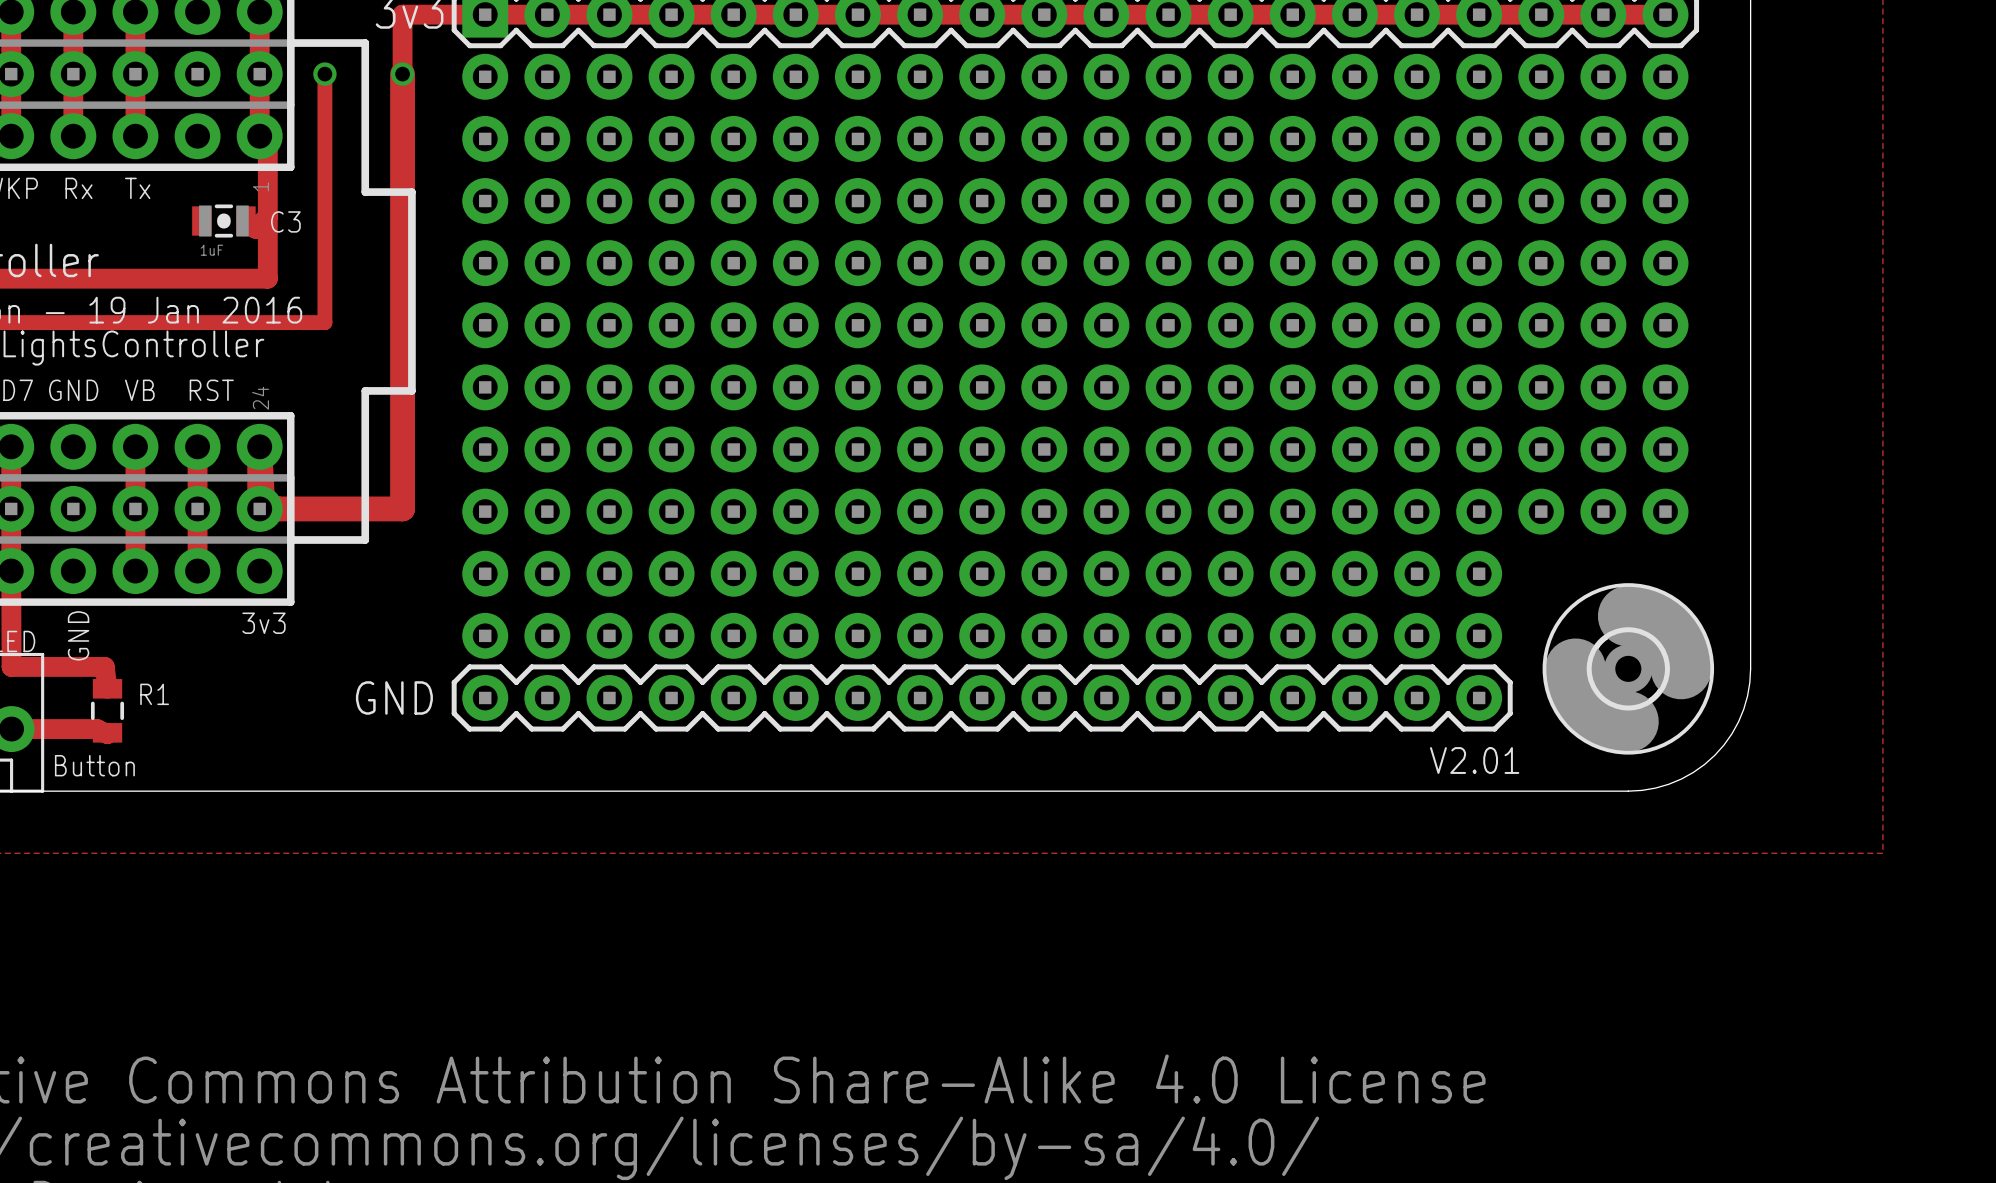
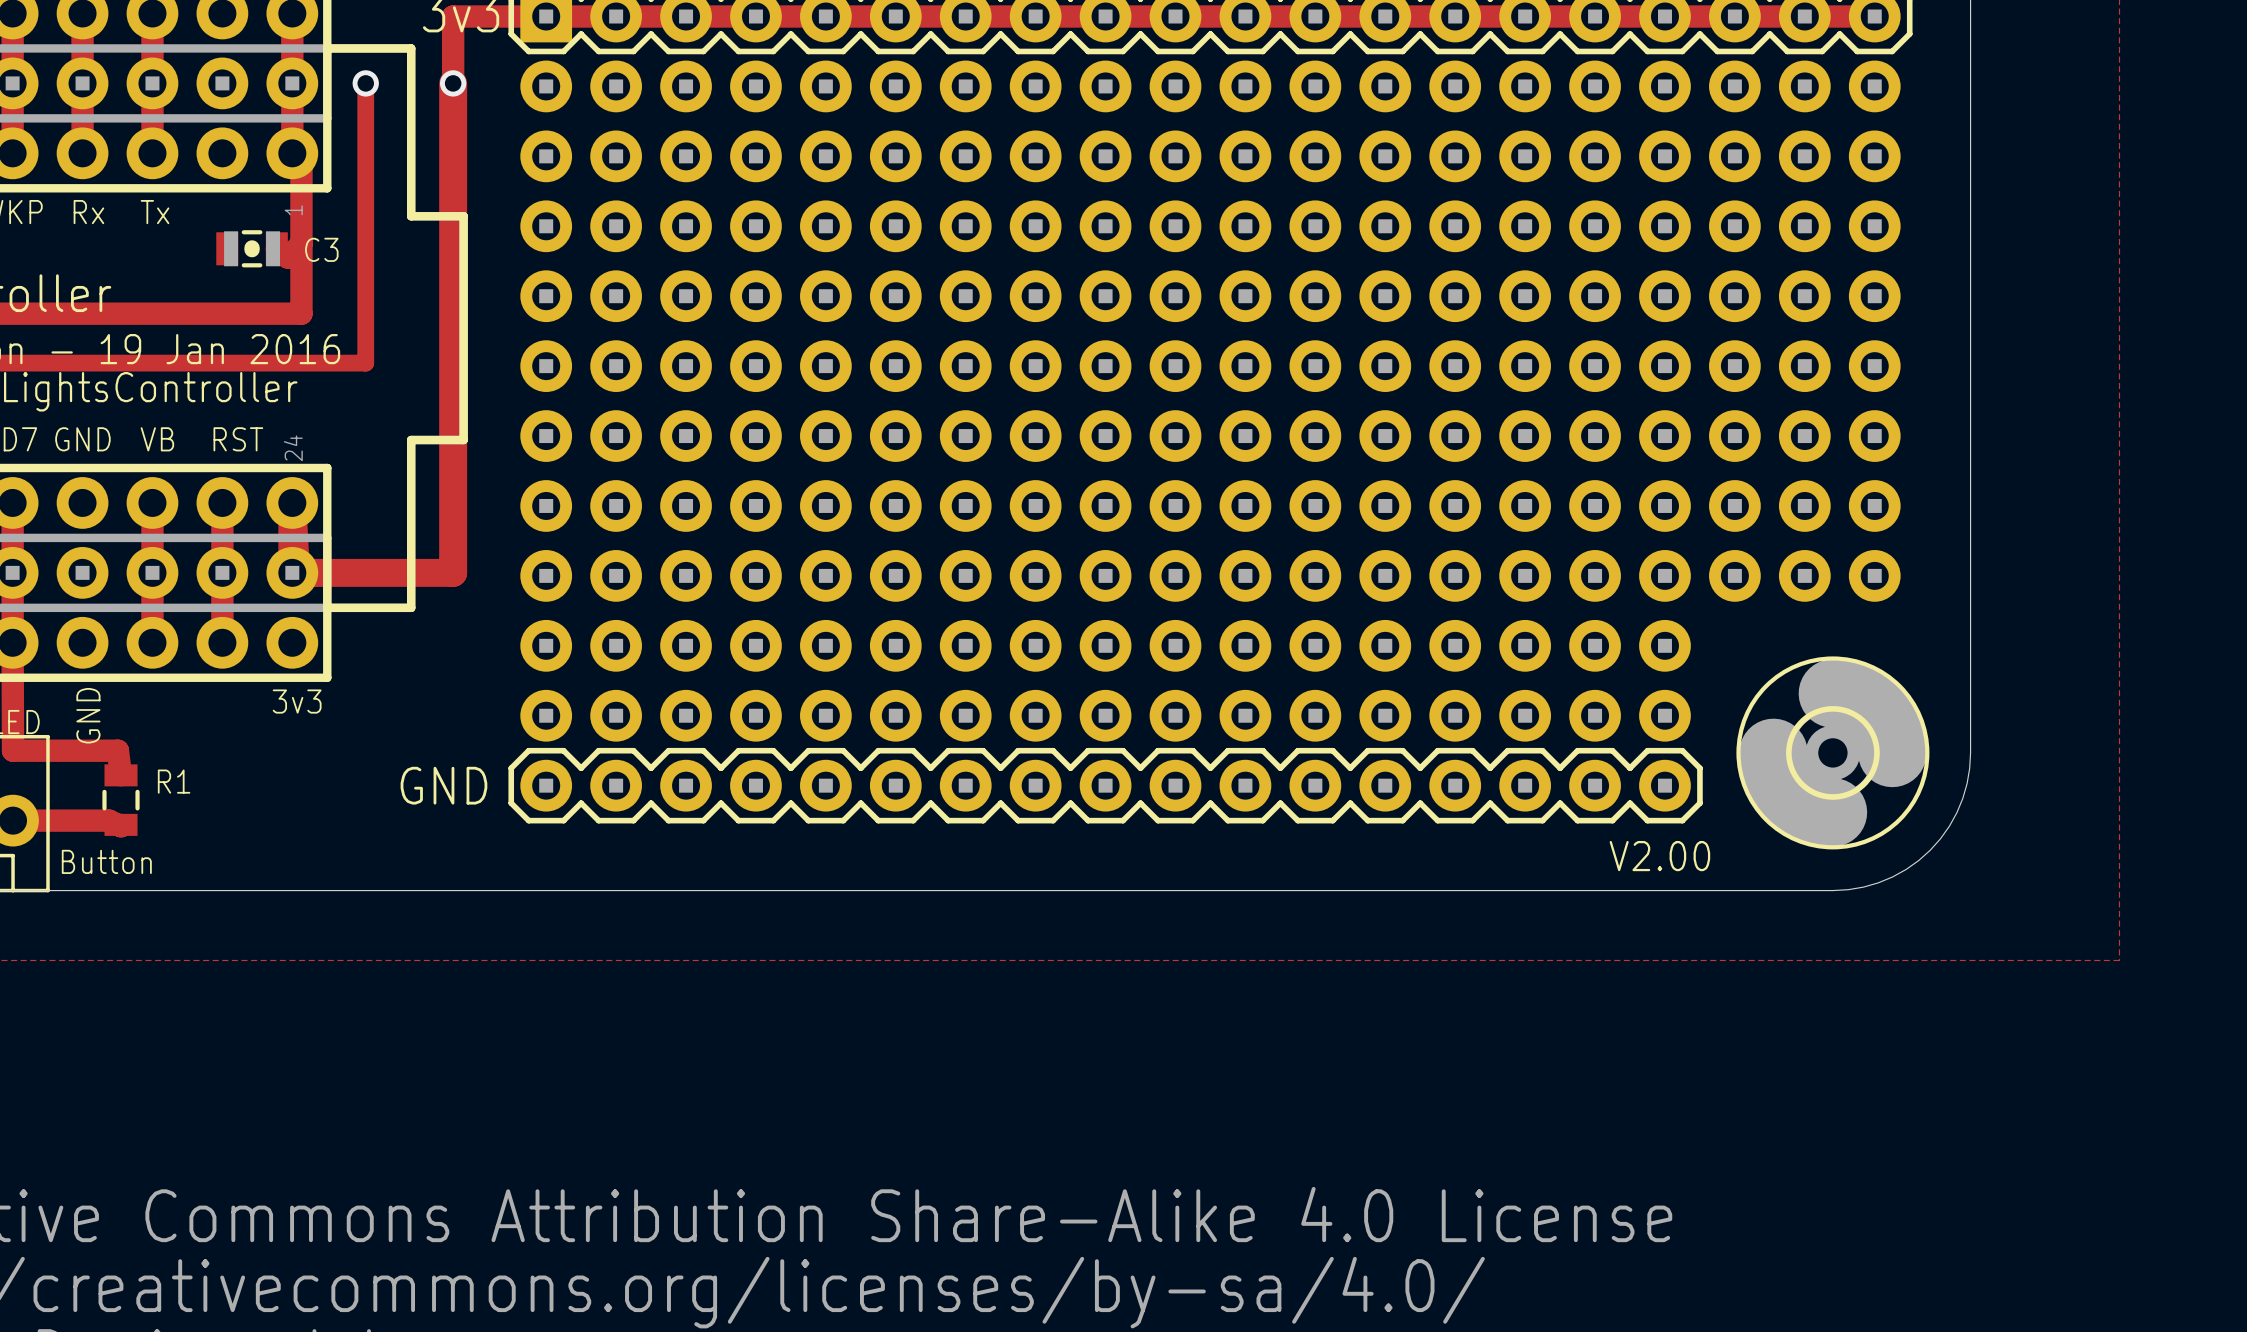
C3 value: 1uF (211, 250) -> none
text: V2.01 (1474, 760) -> V2.00 (1659, 856)

